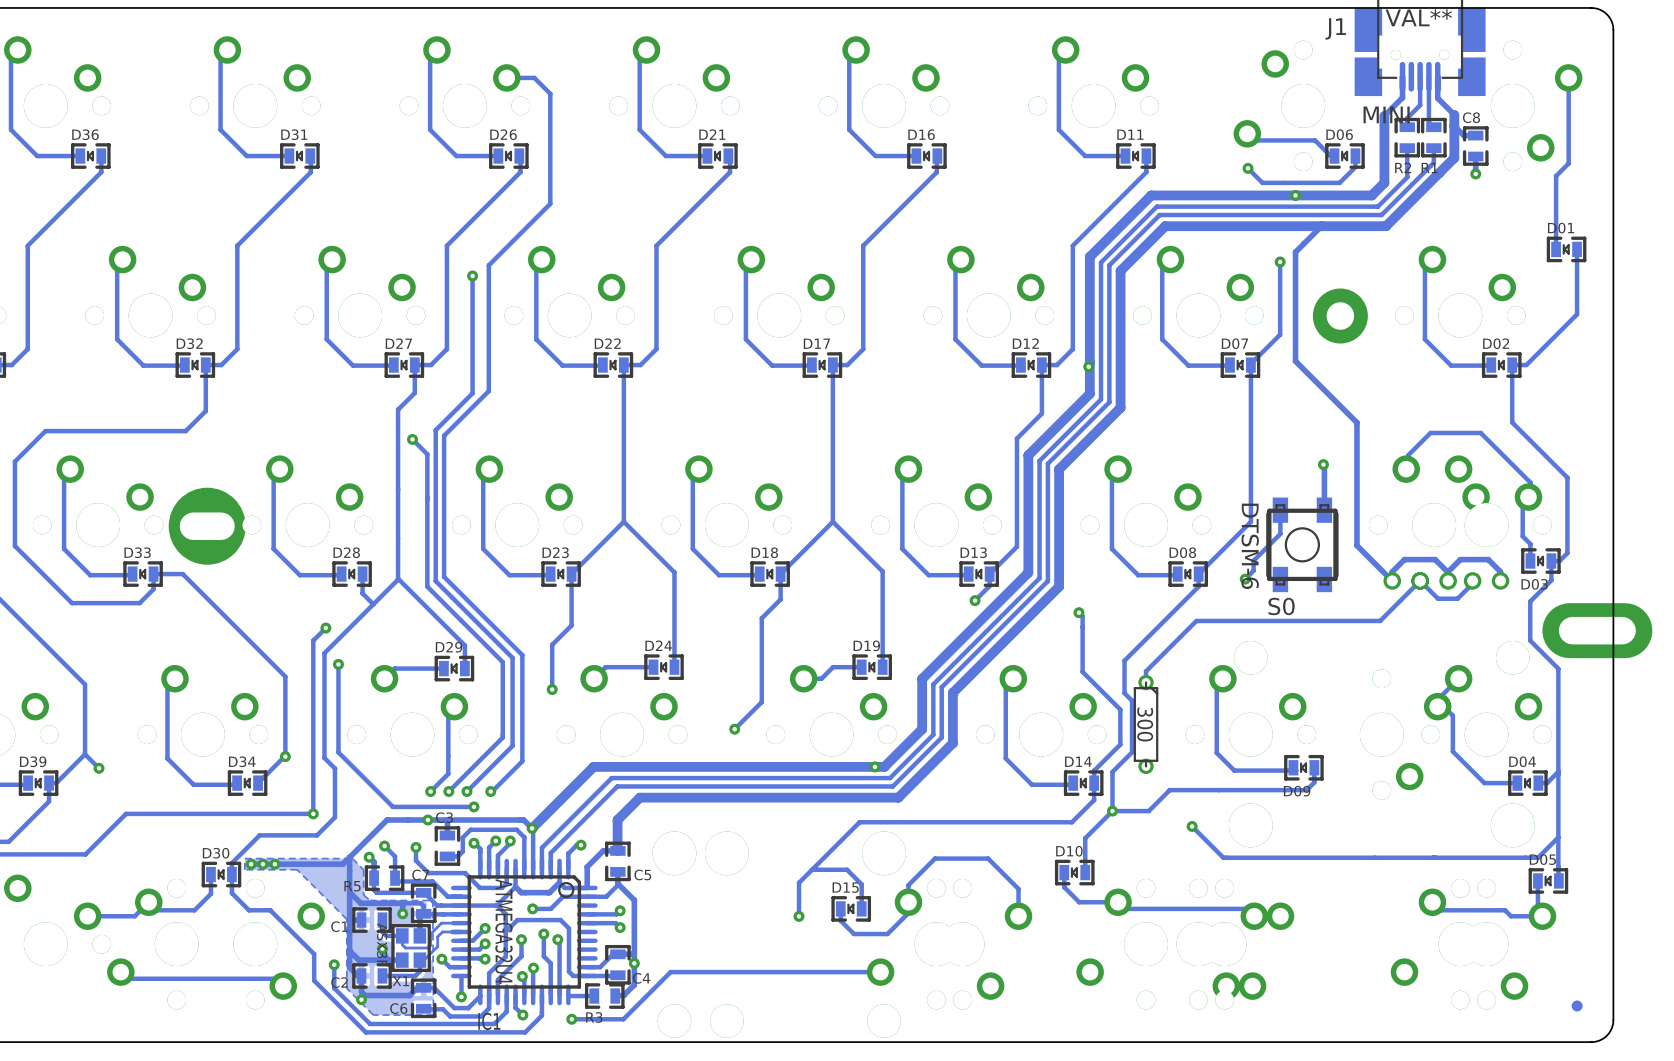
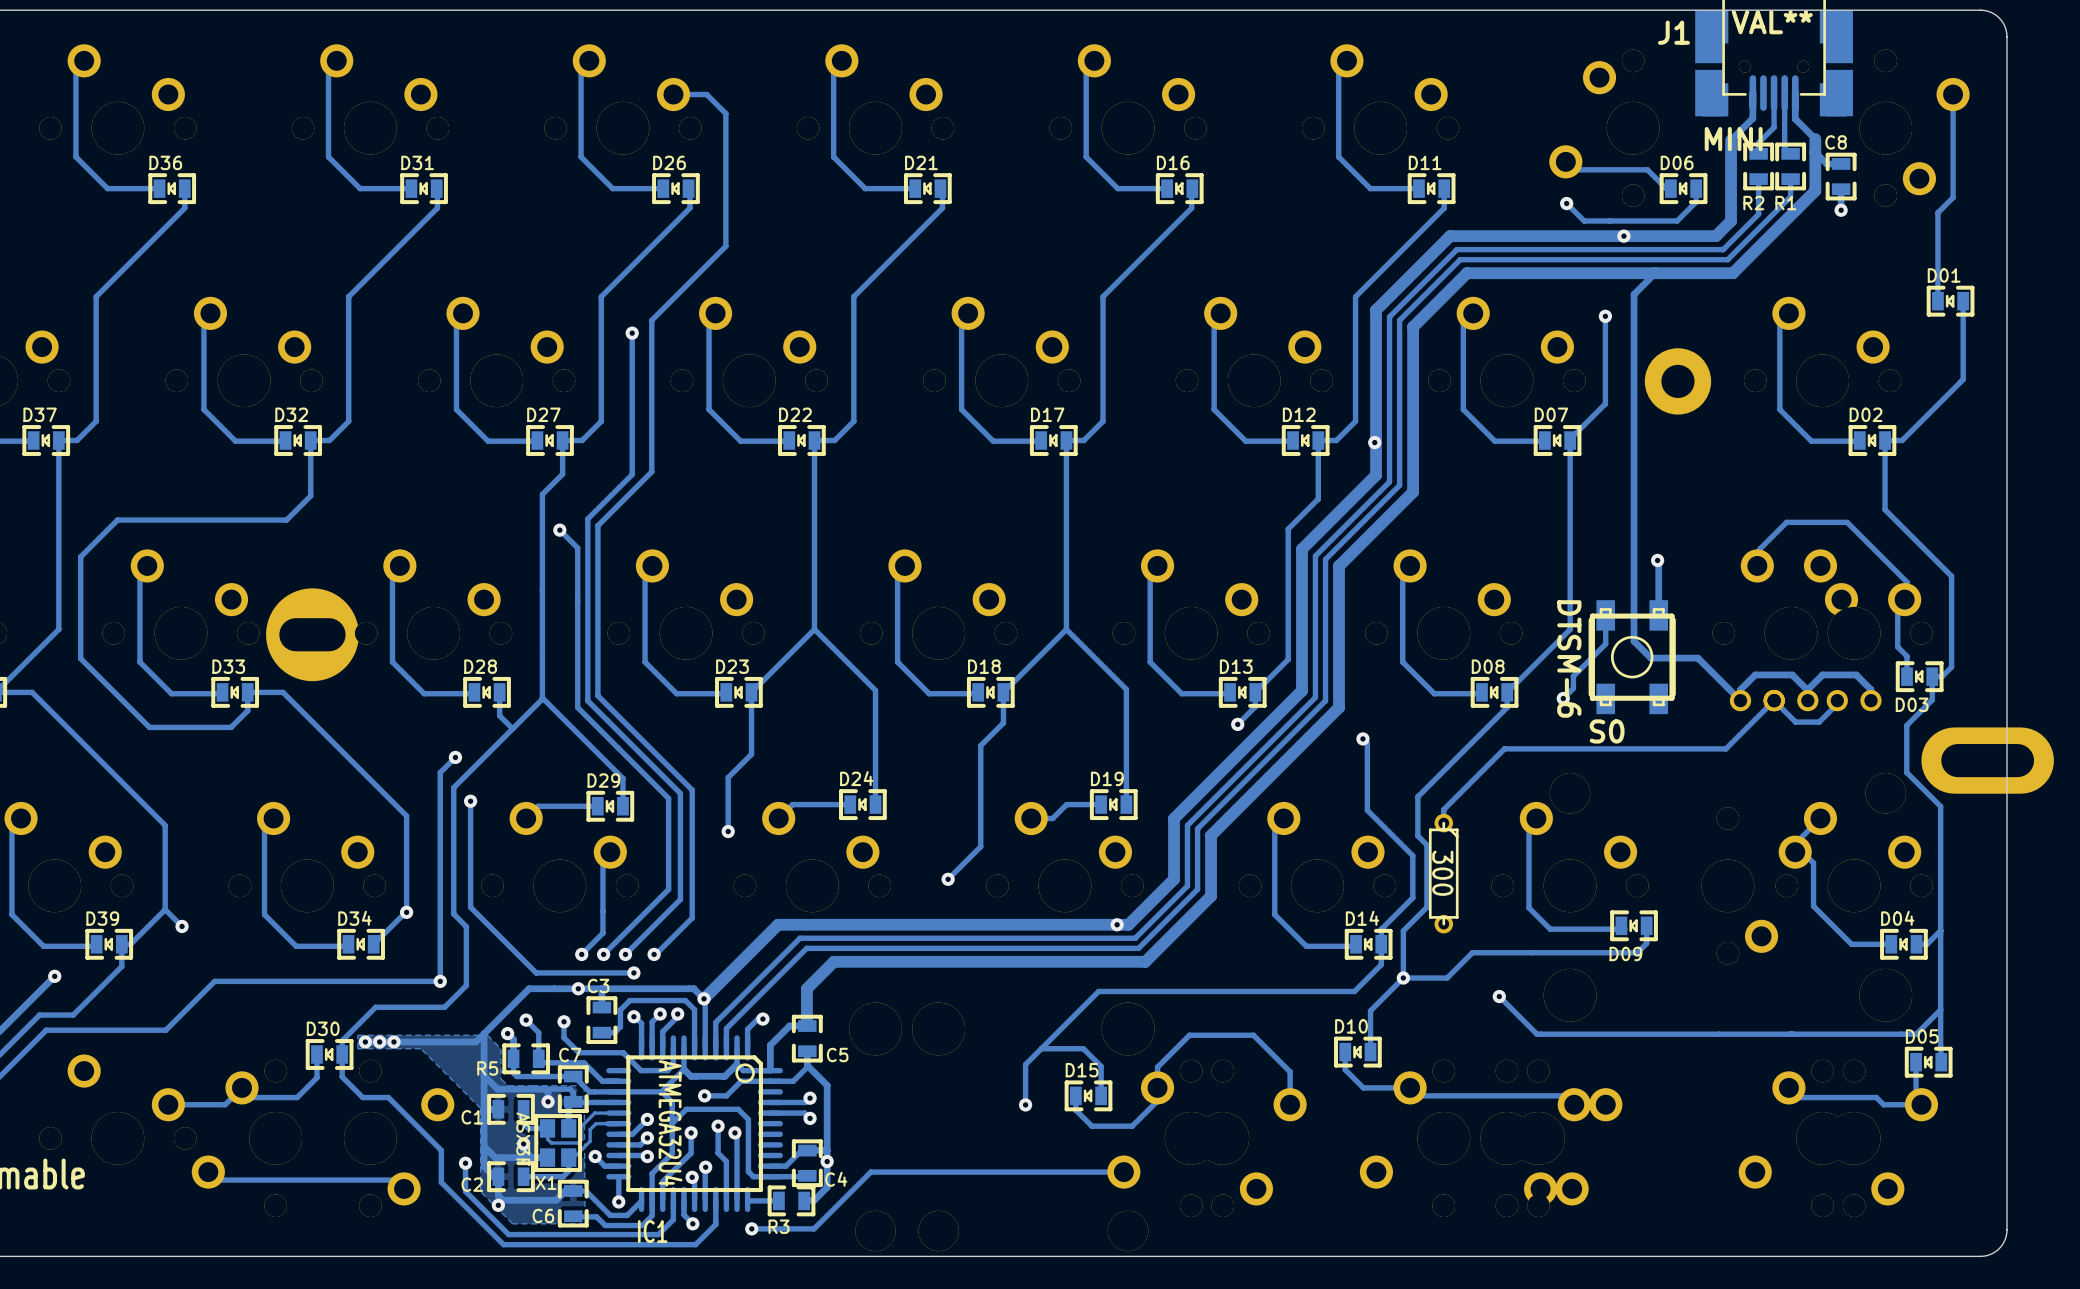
track: (1303, 243) (1295, 252) (1295, 361) (1356, 422) (1356, 545) -> (1634, 294) (1634, 641) (1650, 658) (1697, 658)
drawing: [1571, 1000, 1583, 1012] -> none

